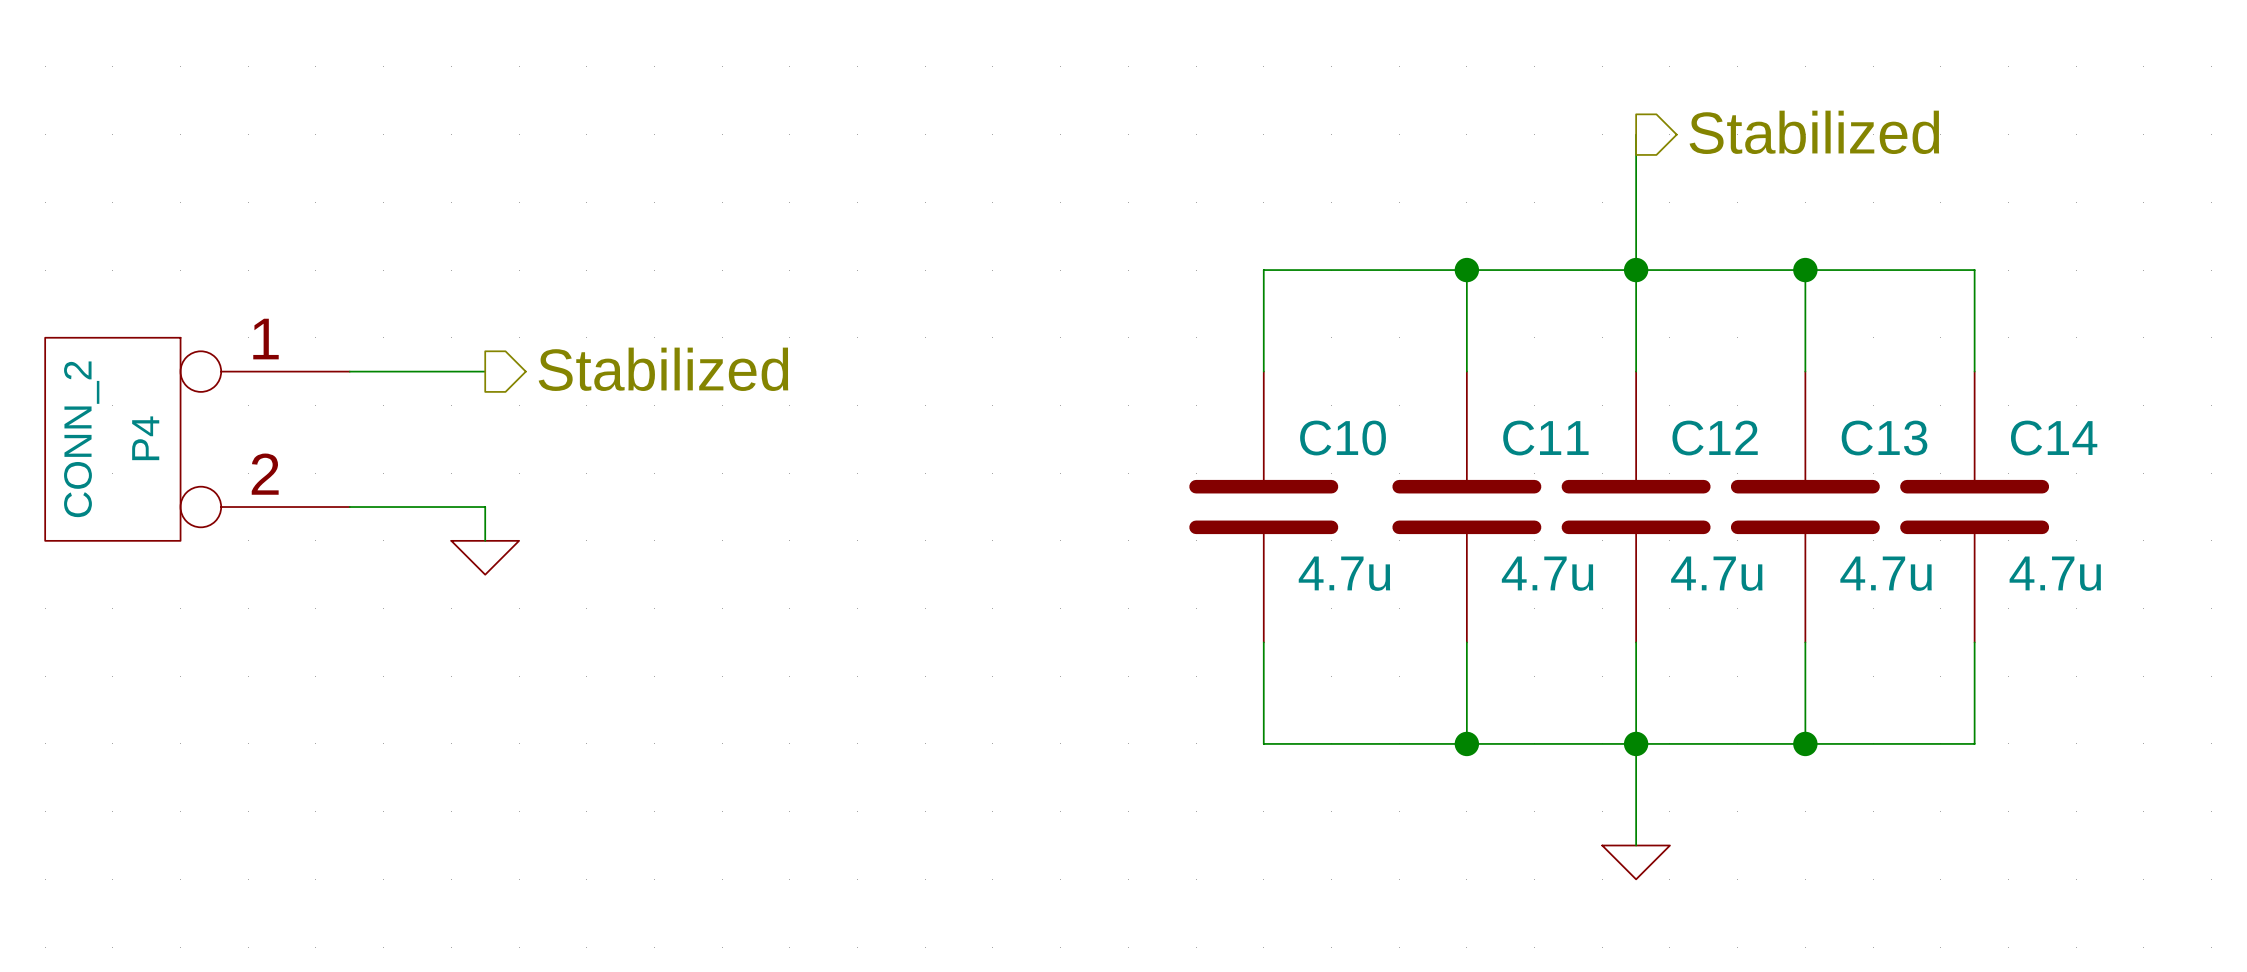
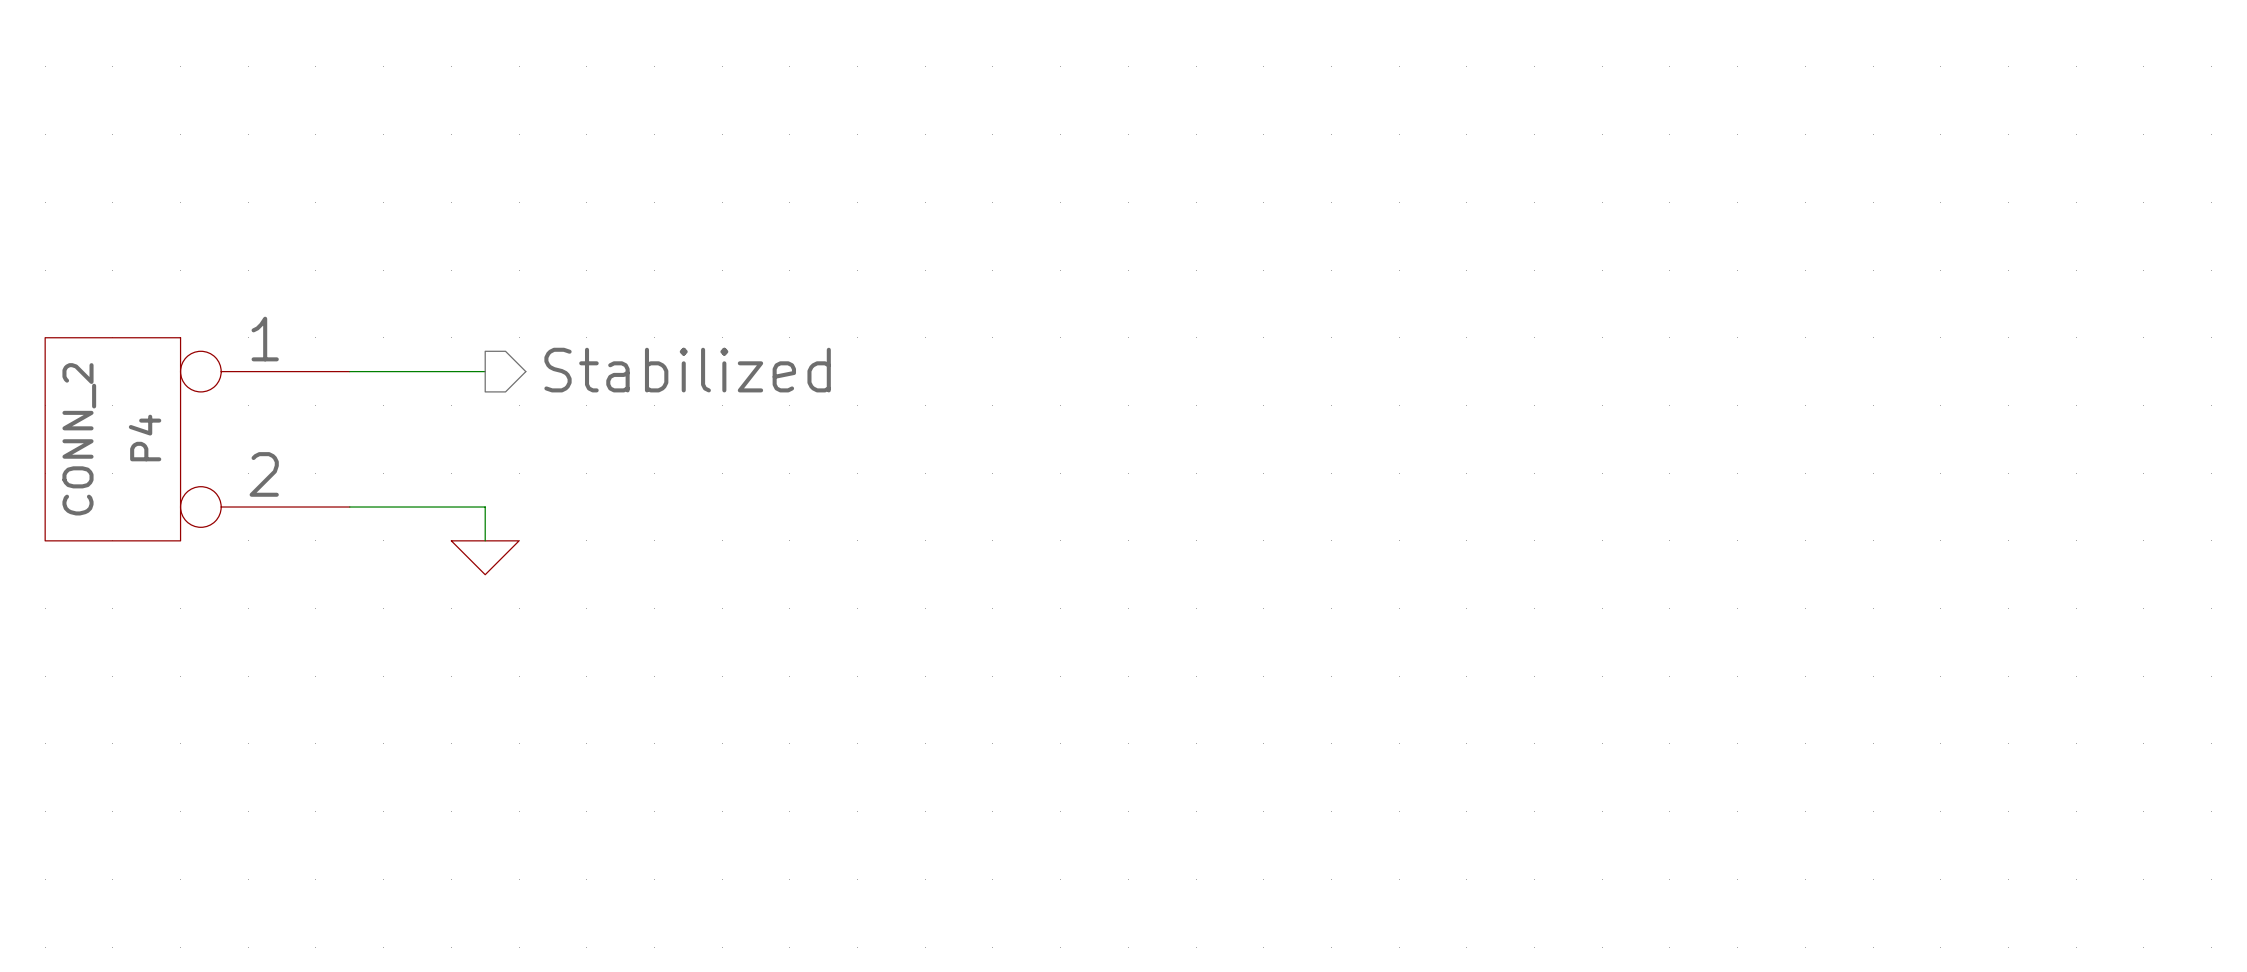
hierarchical label: Stabilized (1814, 132) -> none
wire: (1636, 134) (1636, 371) -> none
wire: (1466, 270) (1466, 371) -> none
junction: (1466, 270) -> none
junction: (1636, 270) -> none
wire: (1805, 270) (1805, 371) -> none
junction: (1805, 270) -> none
wire: (1263, 371) (1263, 270) (1974, 270) (1974, 371) -> none
C10: 4.7u (1263, 507) -> none
C11: 4.7u (1466, 507) -> none
C12: 4.7u (1636, 507) -> none
C13: 4.7u (1805, 507) -> none
C14: 4.7u (1974, 507) -> none
wire: (1263, 642) (1263, 743) (1974, 743) (1974, 642) -> none
wire: (1466, 642) (1466, 743) -> none
wire: (1636, 642) (1636, 845) -> none
wire: (1805, 642) (1805, 743) -> none
junction: (1466, 743) -> none
junction: (1636, 743) -> none
junction: (1805, 743) -> none
power symbol: (1636, 862) -> none

